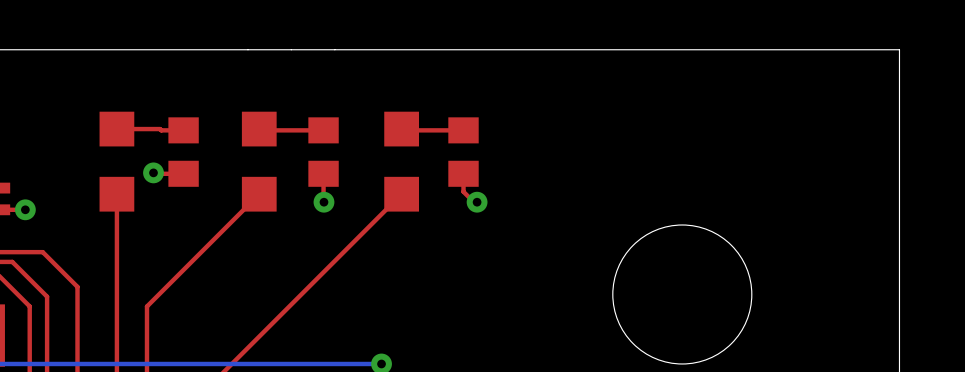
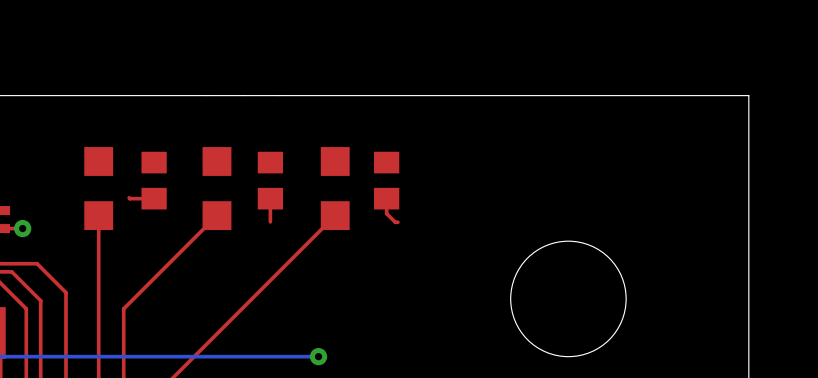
top track: (116, 129) (183, 130) -> none
top track: (259, 129) (323, 130) -> none
top track: (401, 129) (463, 130) -> none
via: (153, 172) -> none
via: (323, 202) -> none
via: (477, 202) -> none

